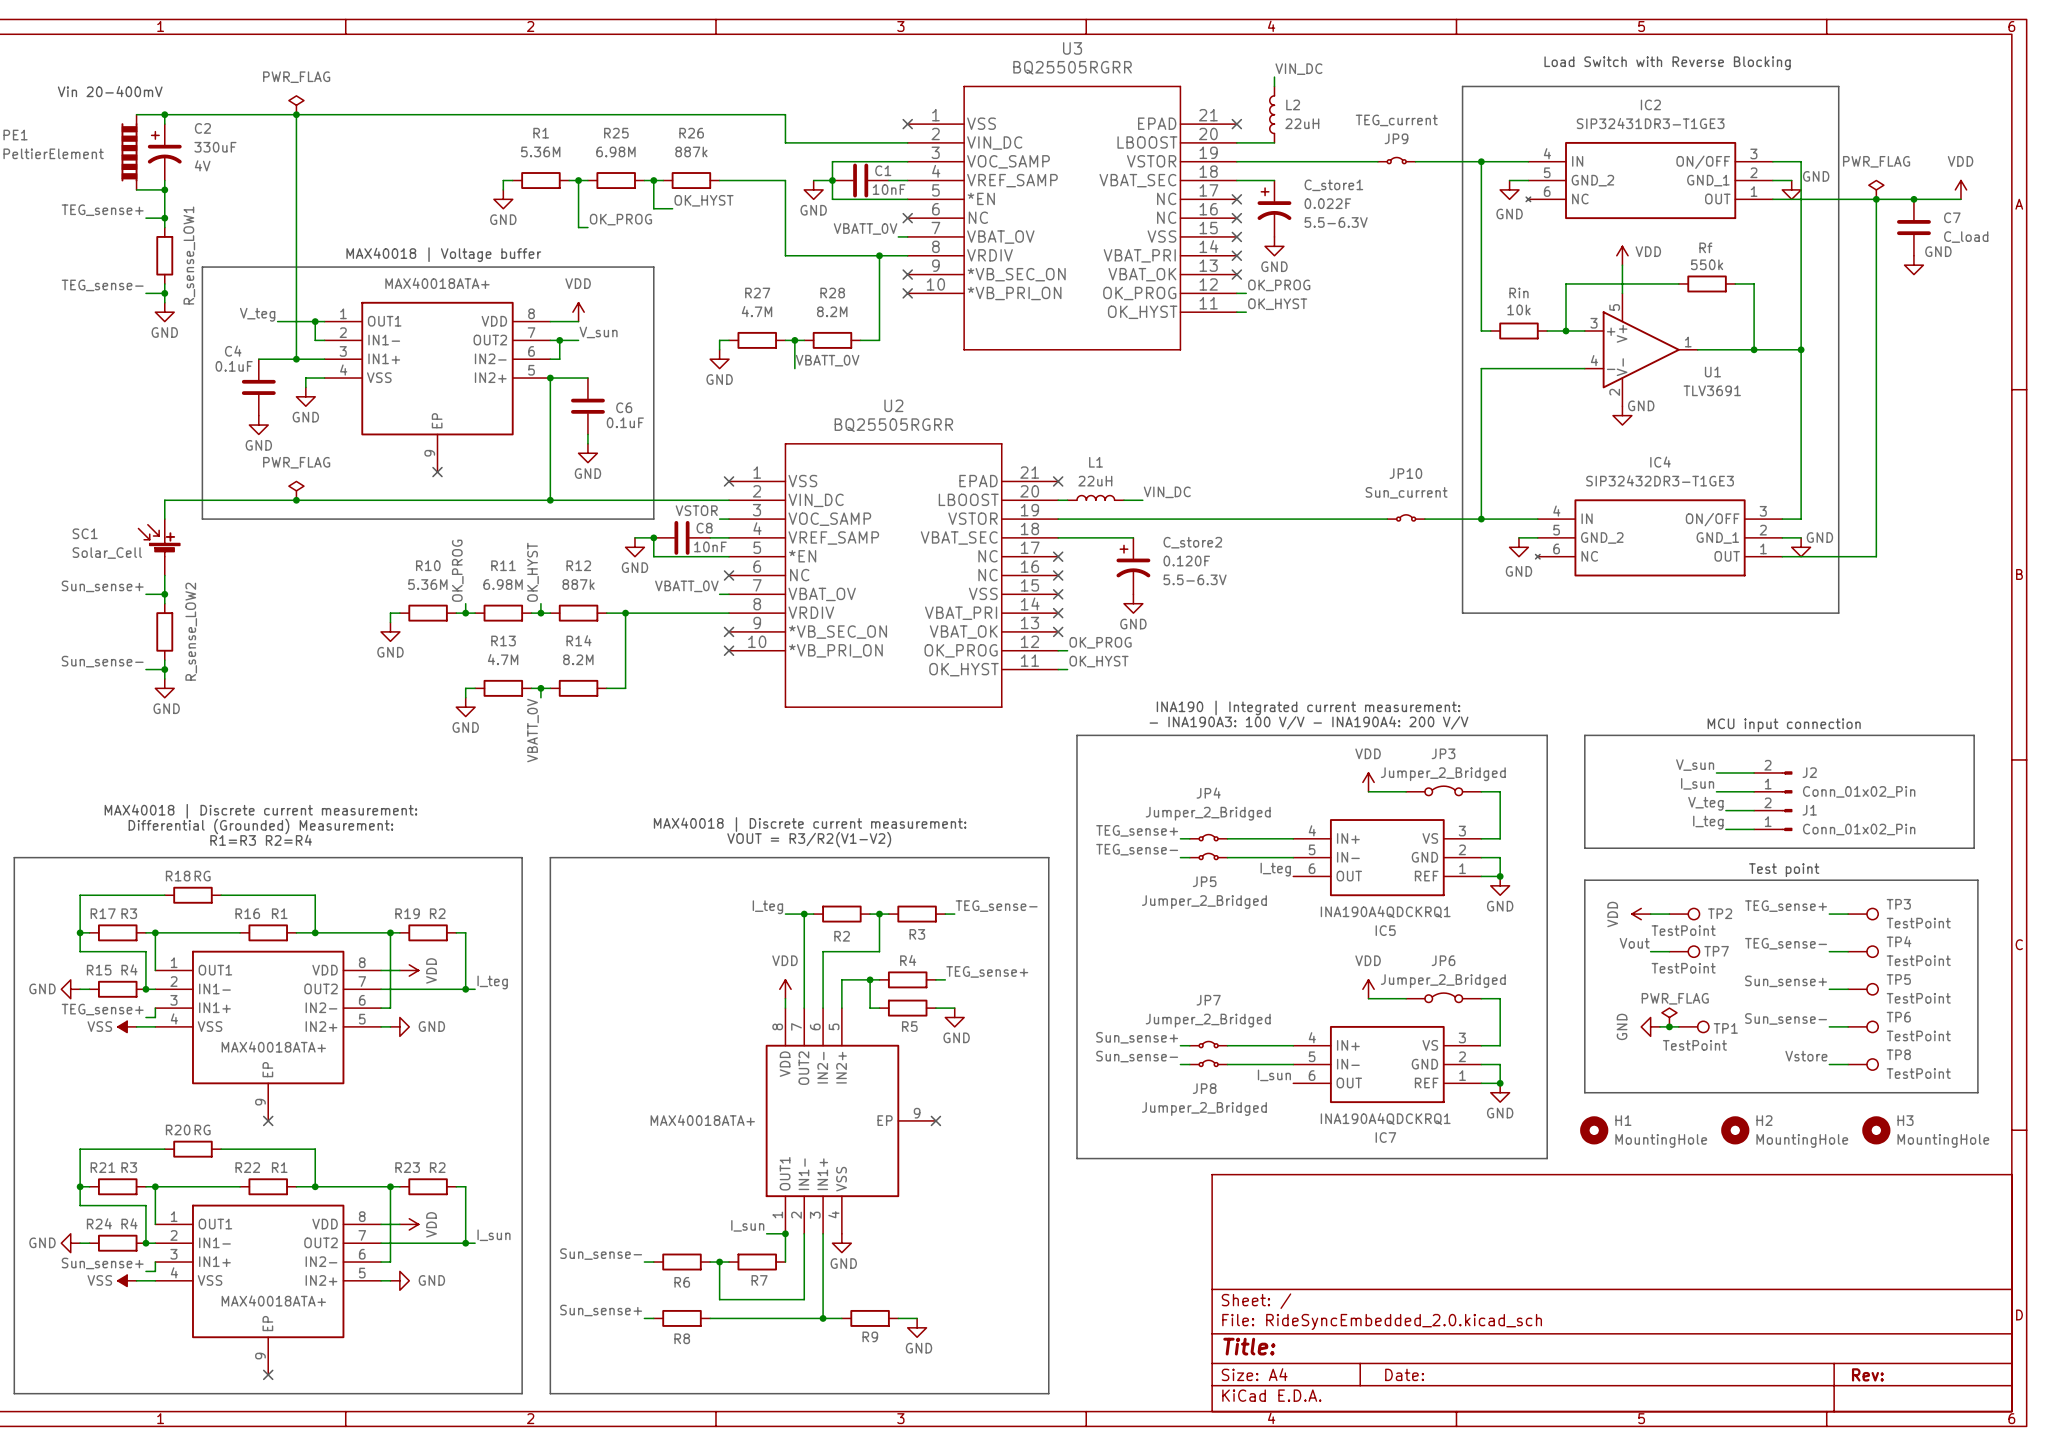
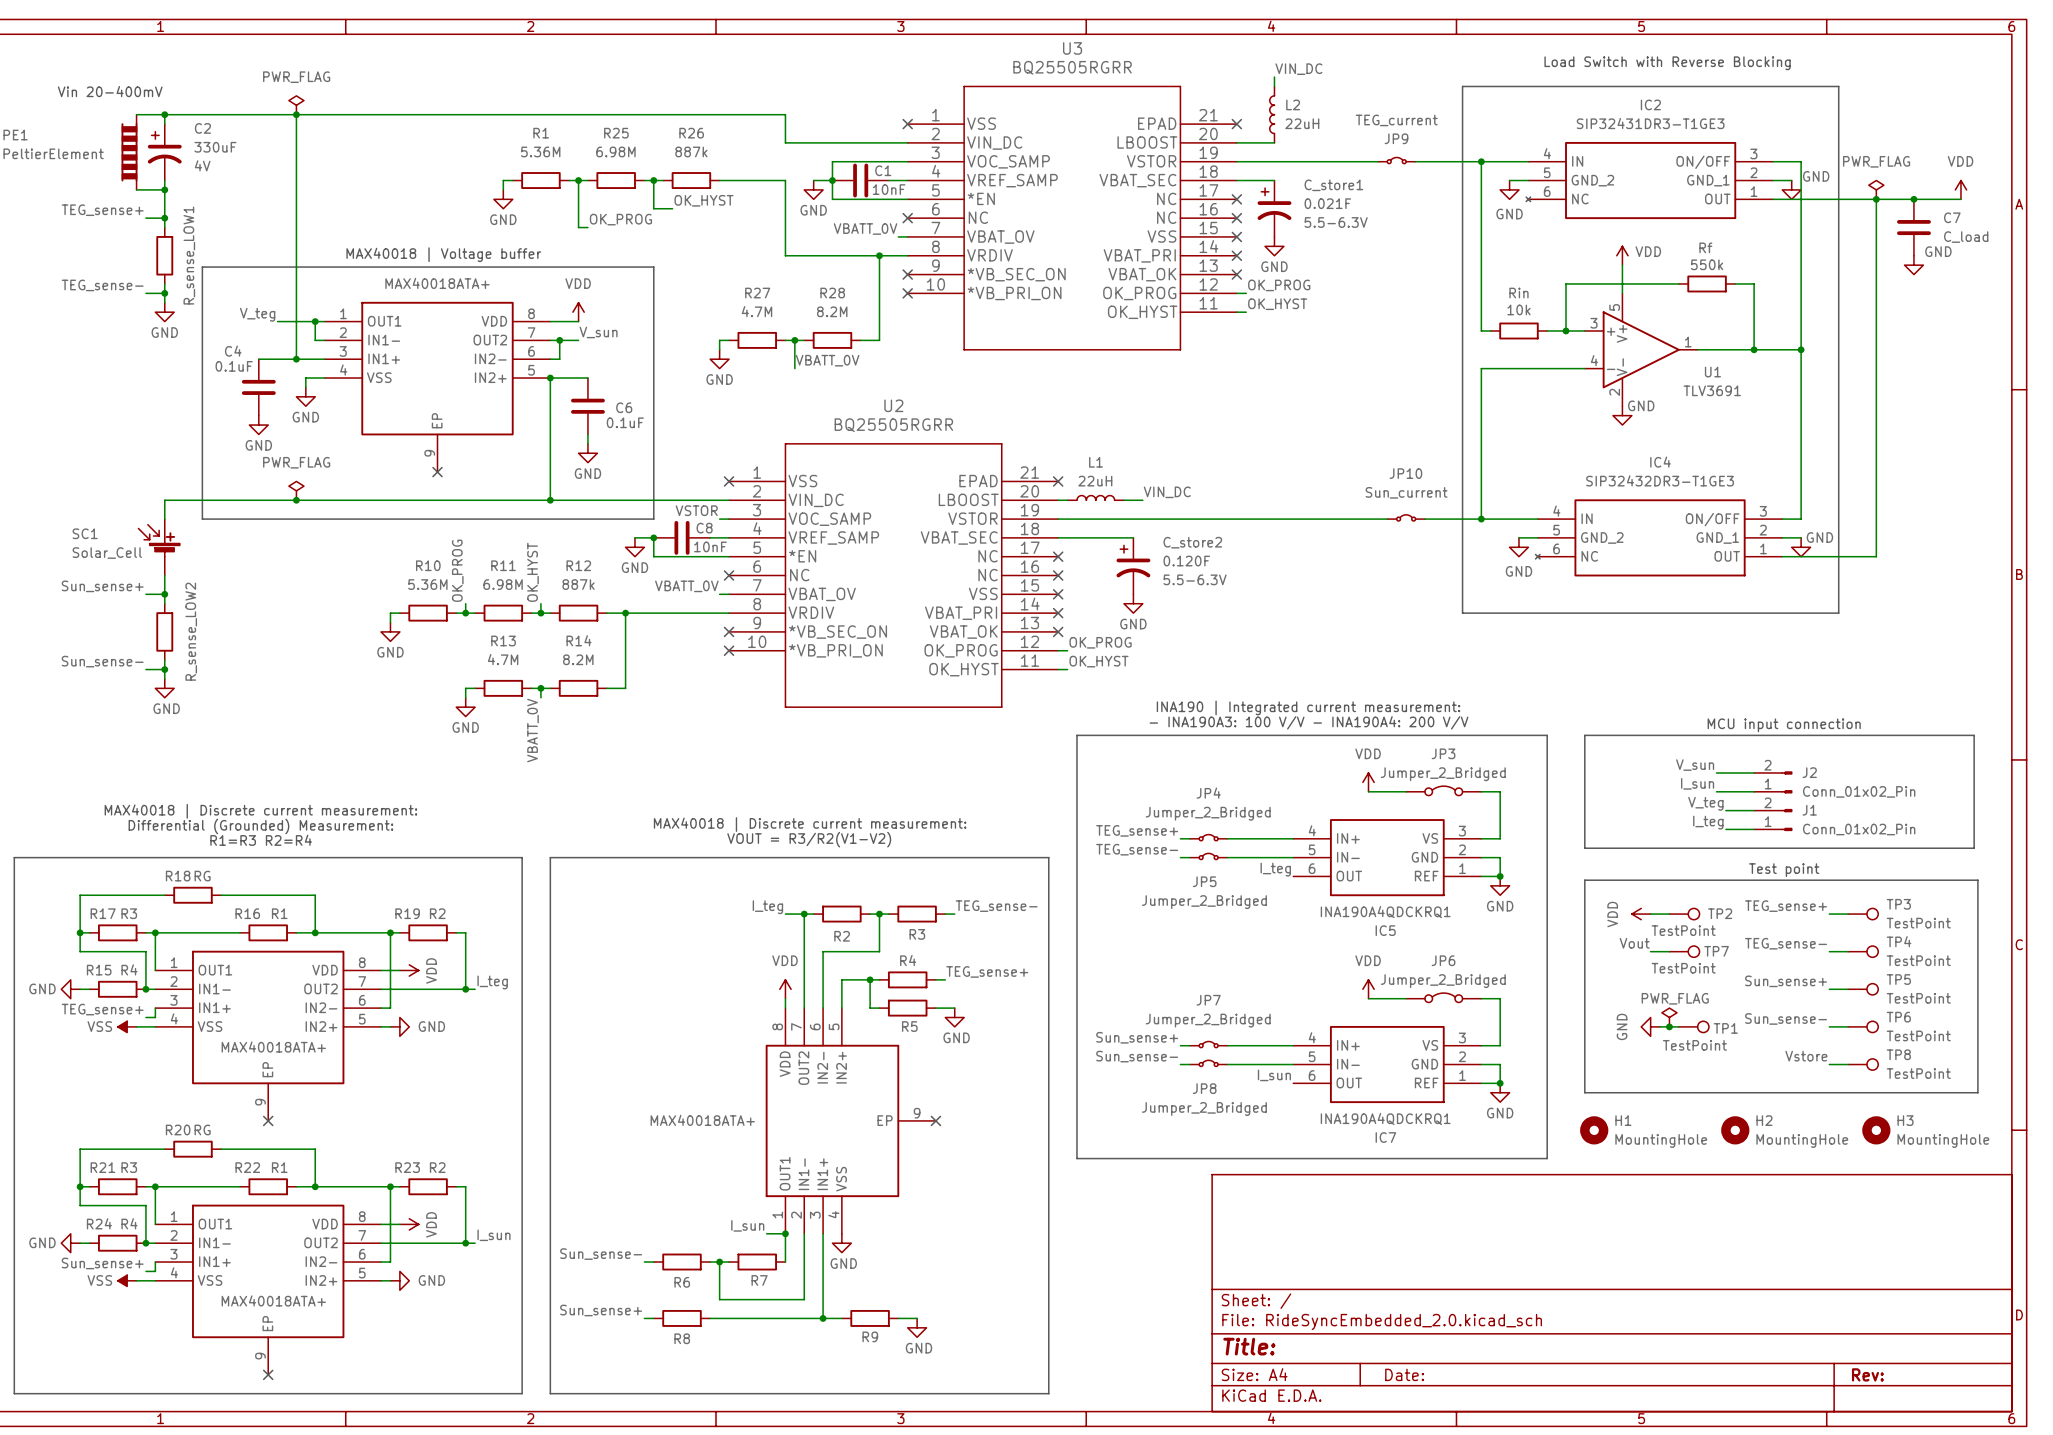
C_store1 value: 0.022F (1327, 203) -> 0.021F (1327, 203)

